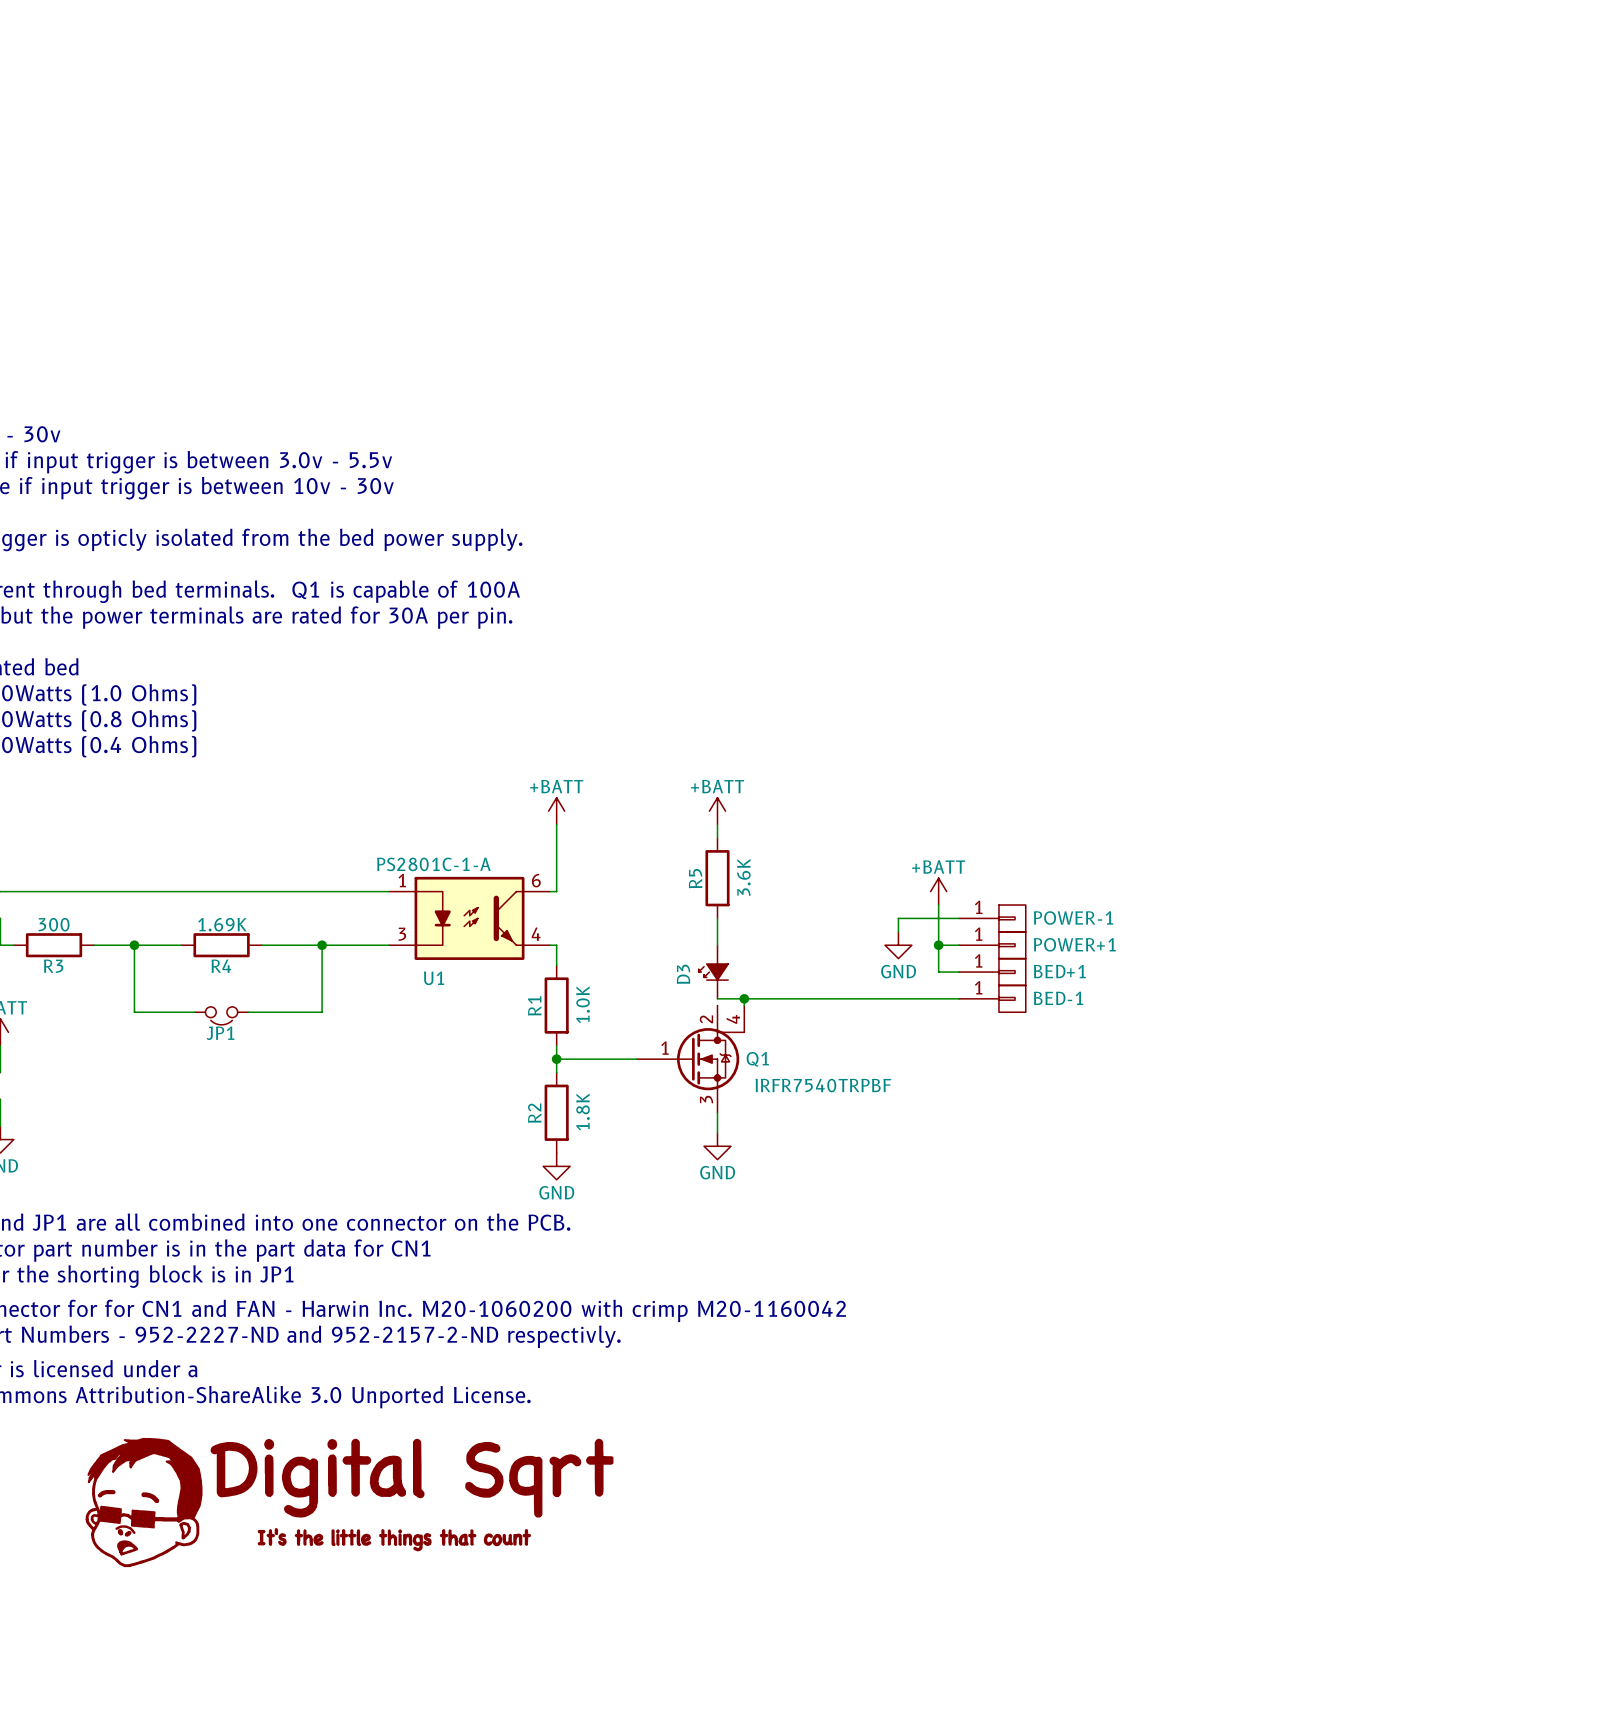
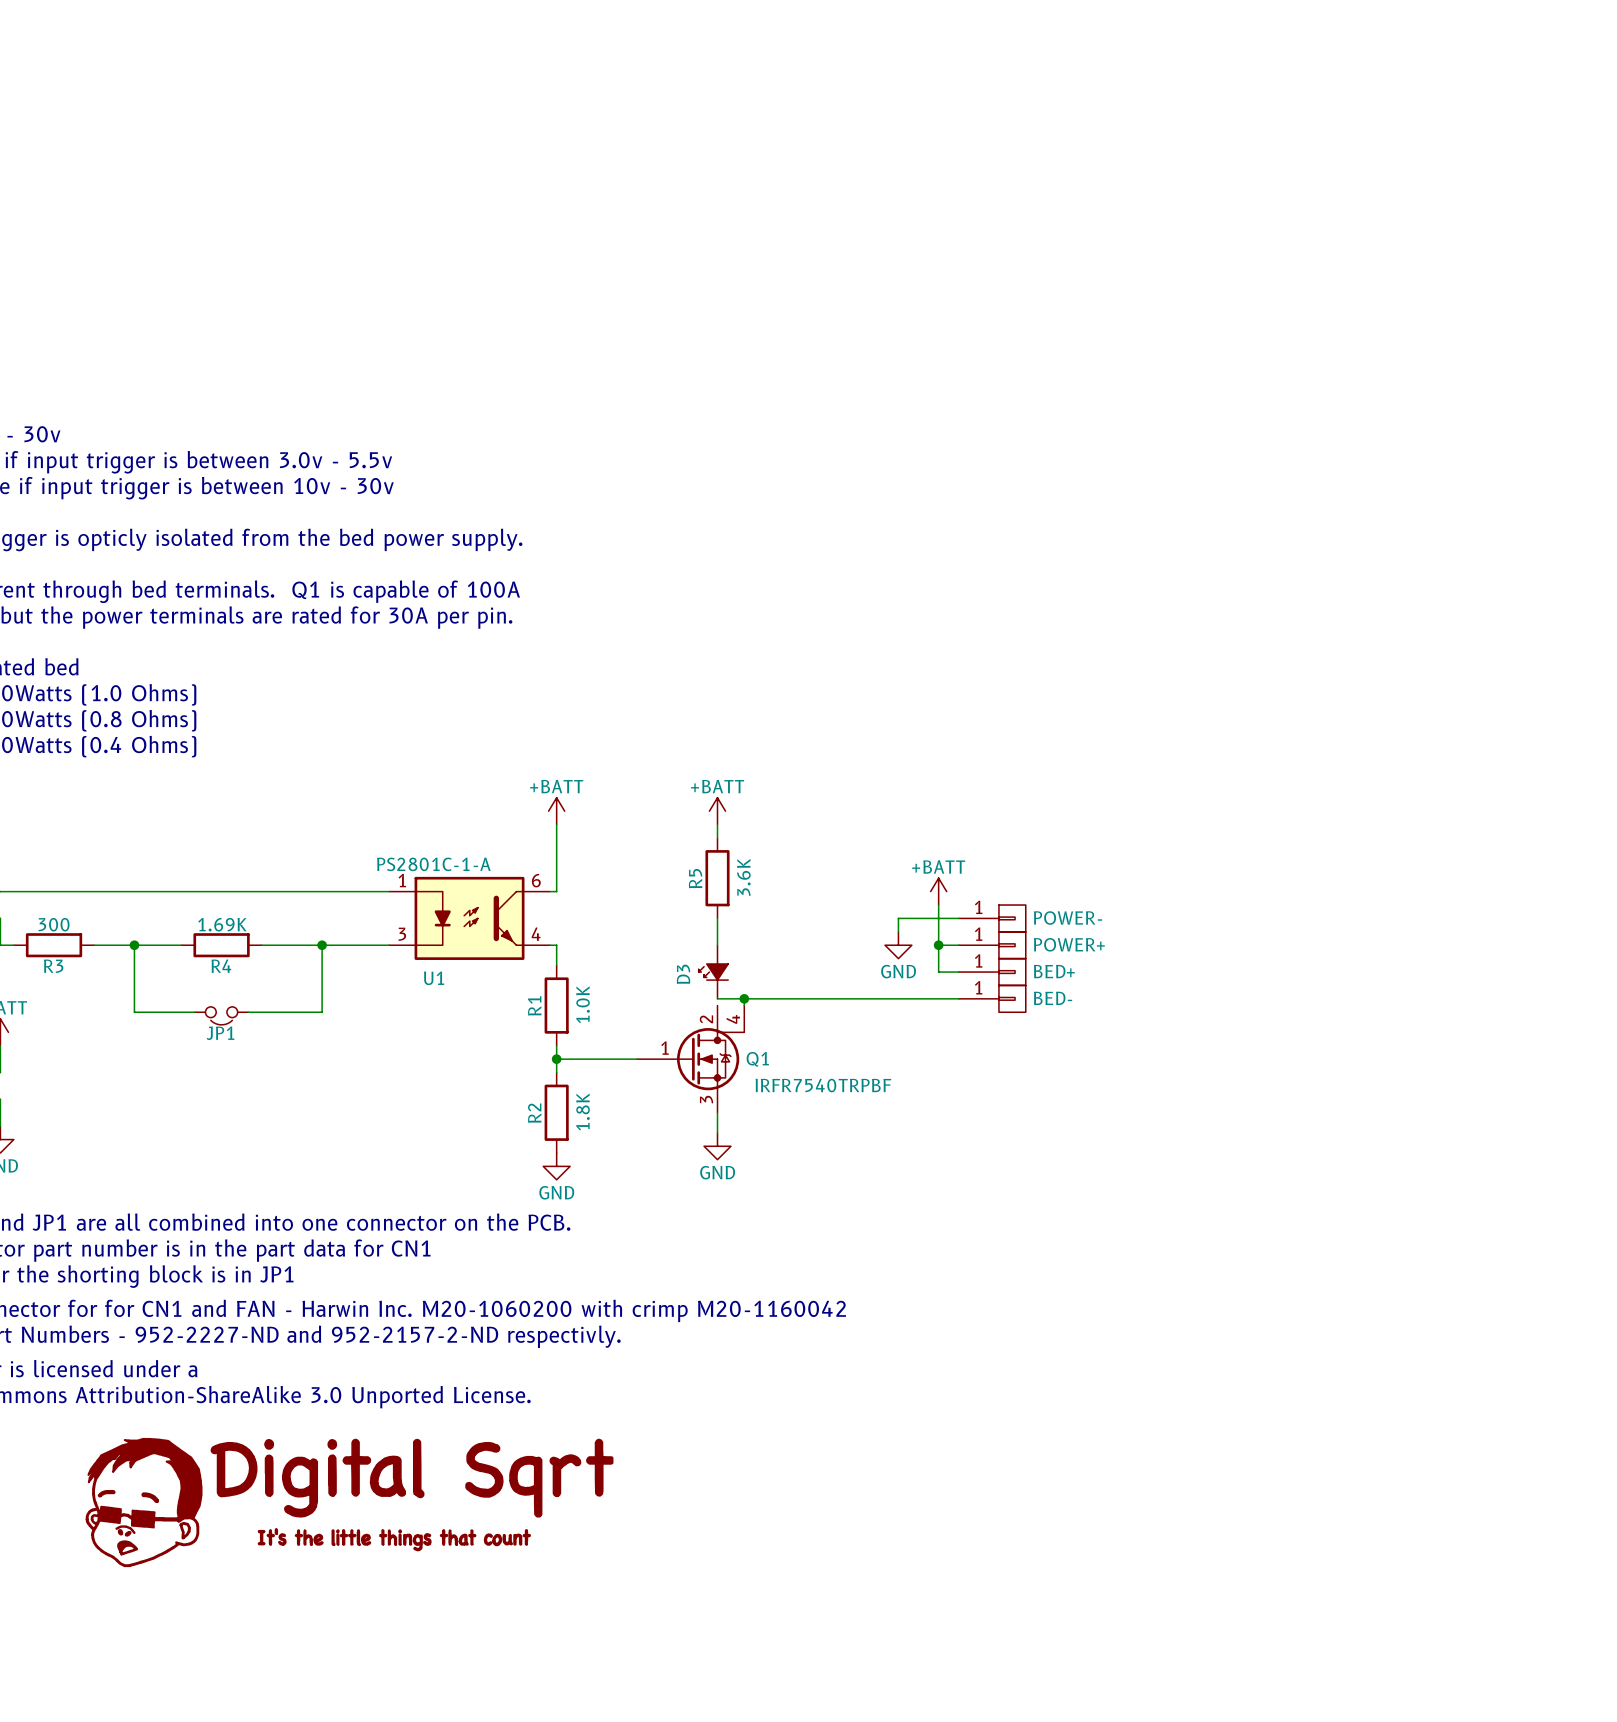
POWER-1 name: POWER-1 (1073, 917) -> POWER- (1067, 917)
POWER+1 name: POWER+1 (1074, 944) -> POWER+ (1069, 944)
BED+1 name: BED+1 (1059, 971) -> BED+ (1054, 971)
BED-1 name: BED-1 (1058, 998) -> BED- (1053, 998)

